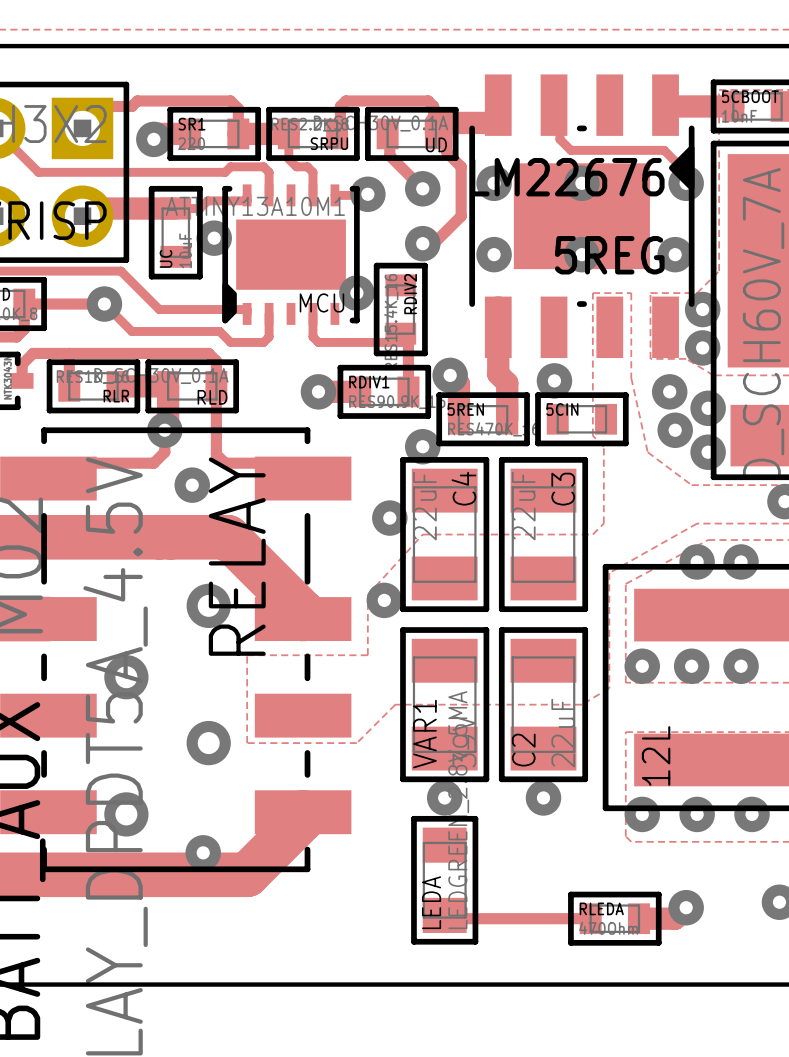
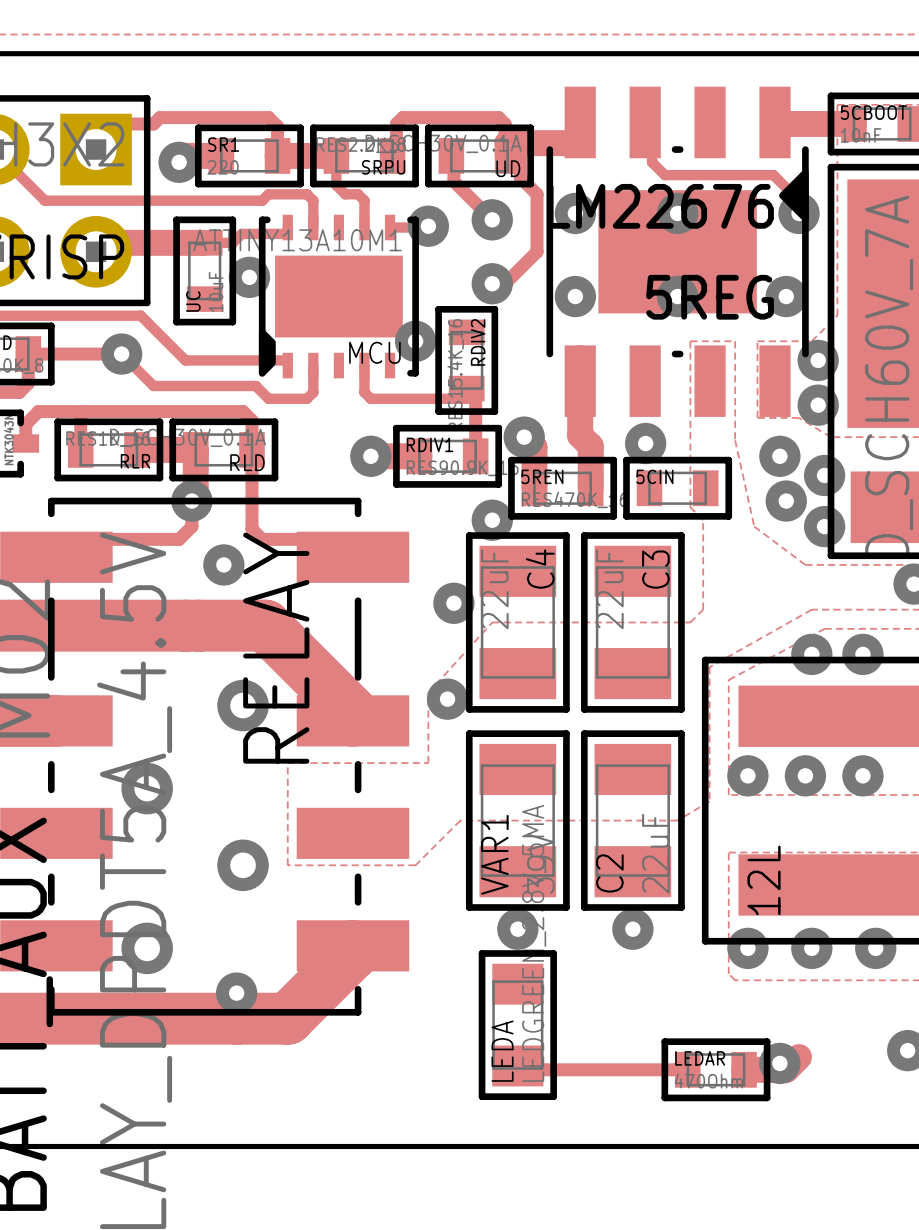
via position: (686, 907) -> (779, 1063)
RLEDA name: RLEDA (601, 908) -> LEDAR (700, 1058)

